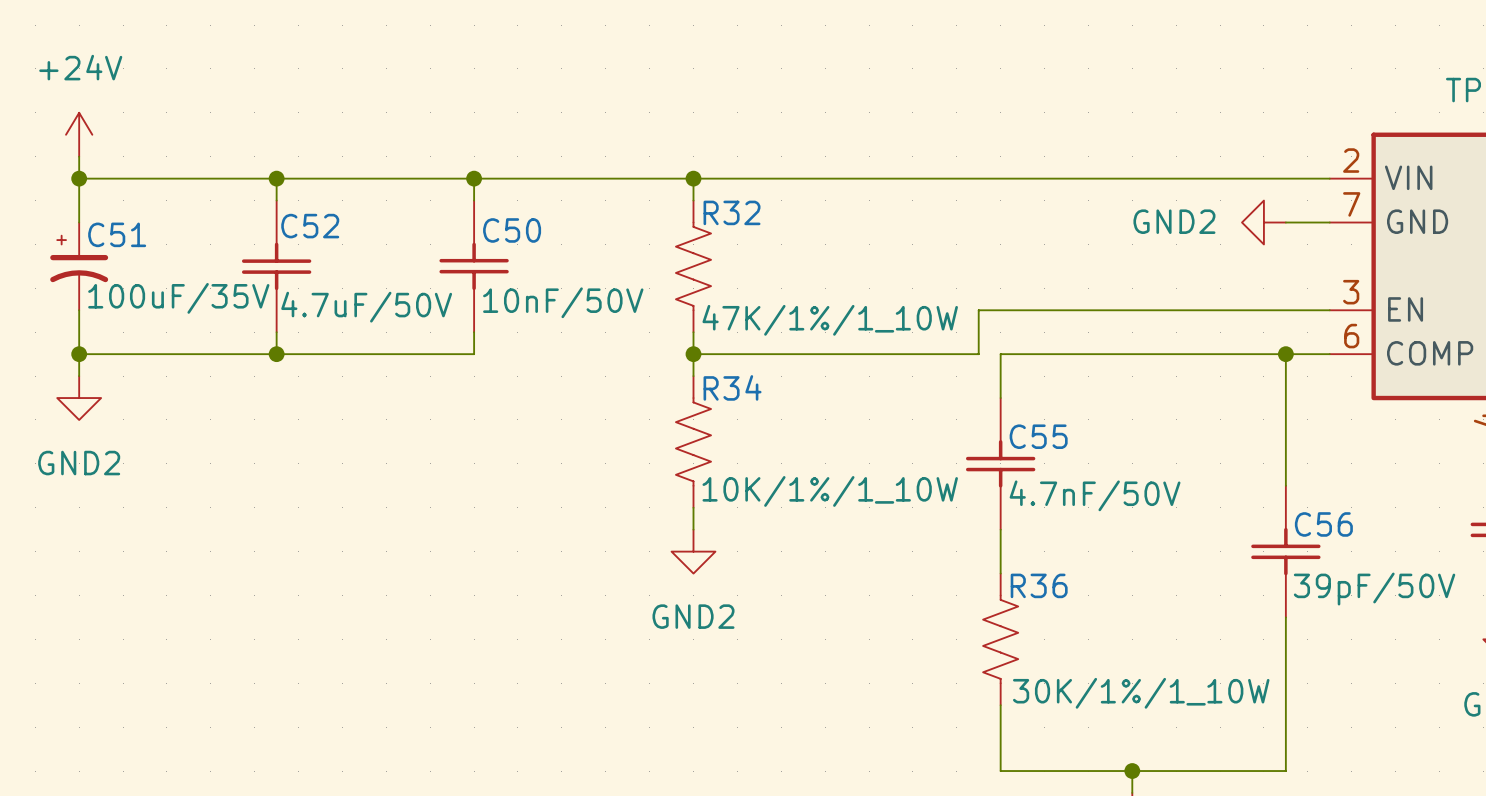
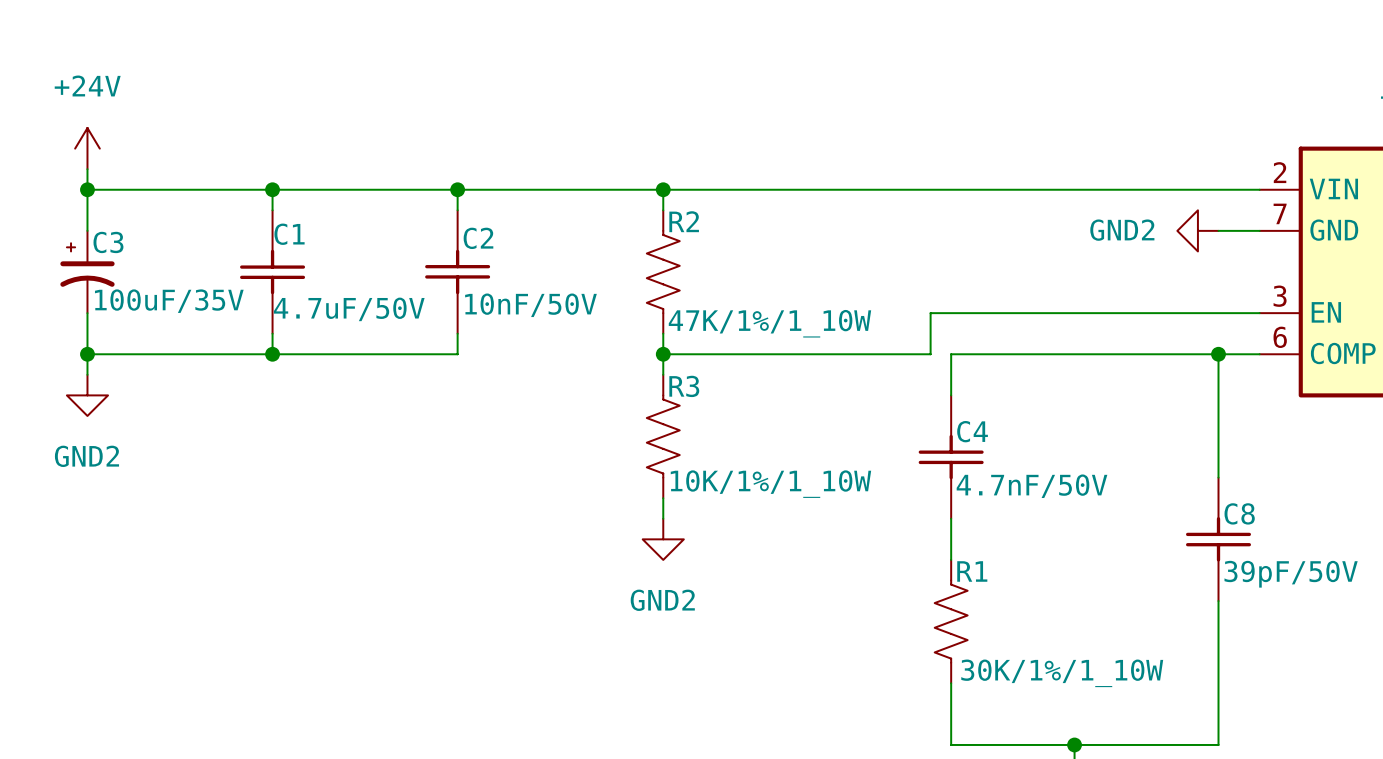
R32 name: R32 (732, 212) -> R2 (684, 221)
C52 name: C52 (310, 226) -> C1 (289, 234)
C50 name: C50 (512, 230) -> C2 (478, 238)
C51 name: C51 (117, 234) -> C3 (108, 242)
R34 name: R34 (732, 387) -> R3 (684, 386)
C55 name: C55 (1038, 436) -> C4 (972, 431)
C56 name: C56 (1323, 524) -> C8 (1239, 513)
R36 name: R36 (1039, 585) -> R1 (972, 571)

